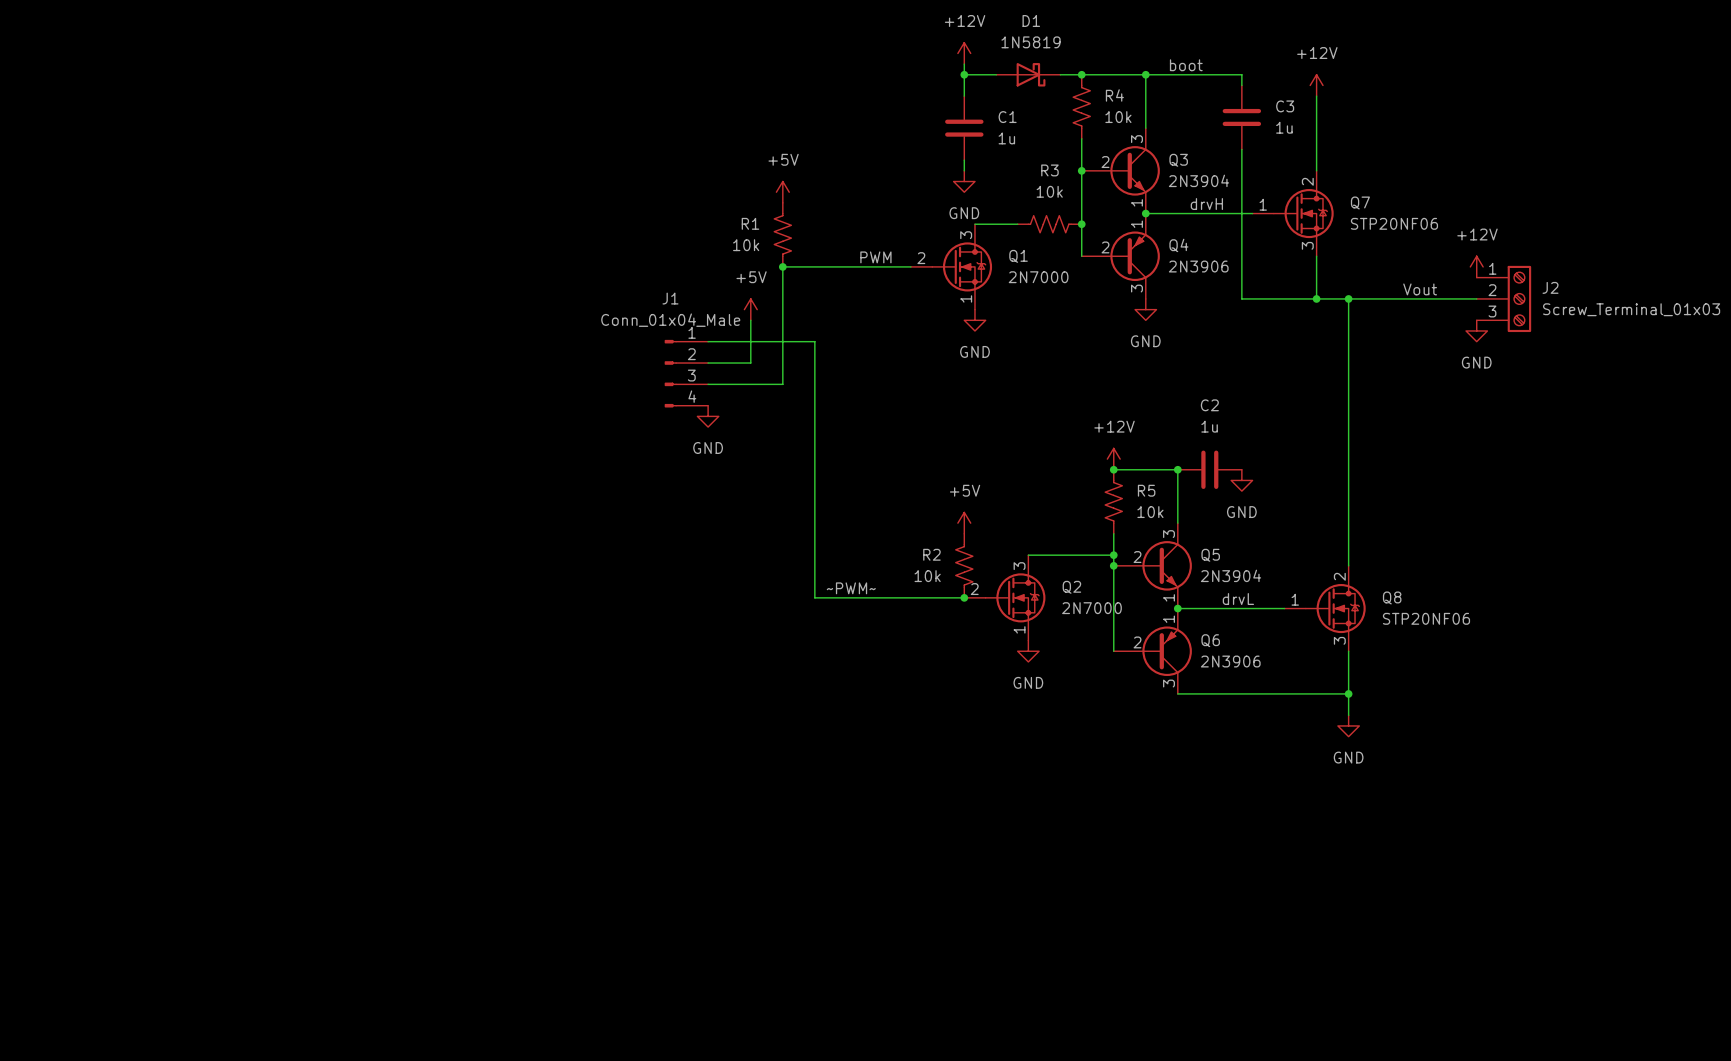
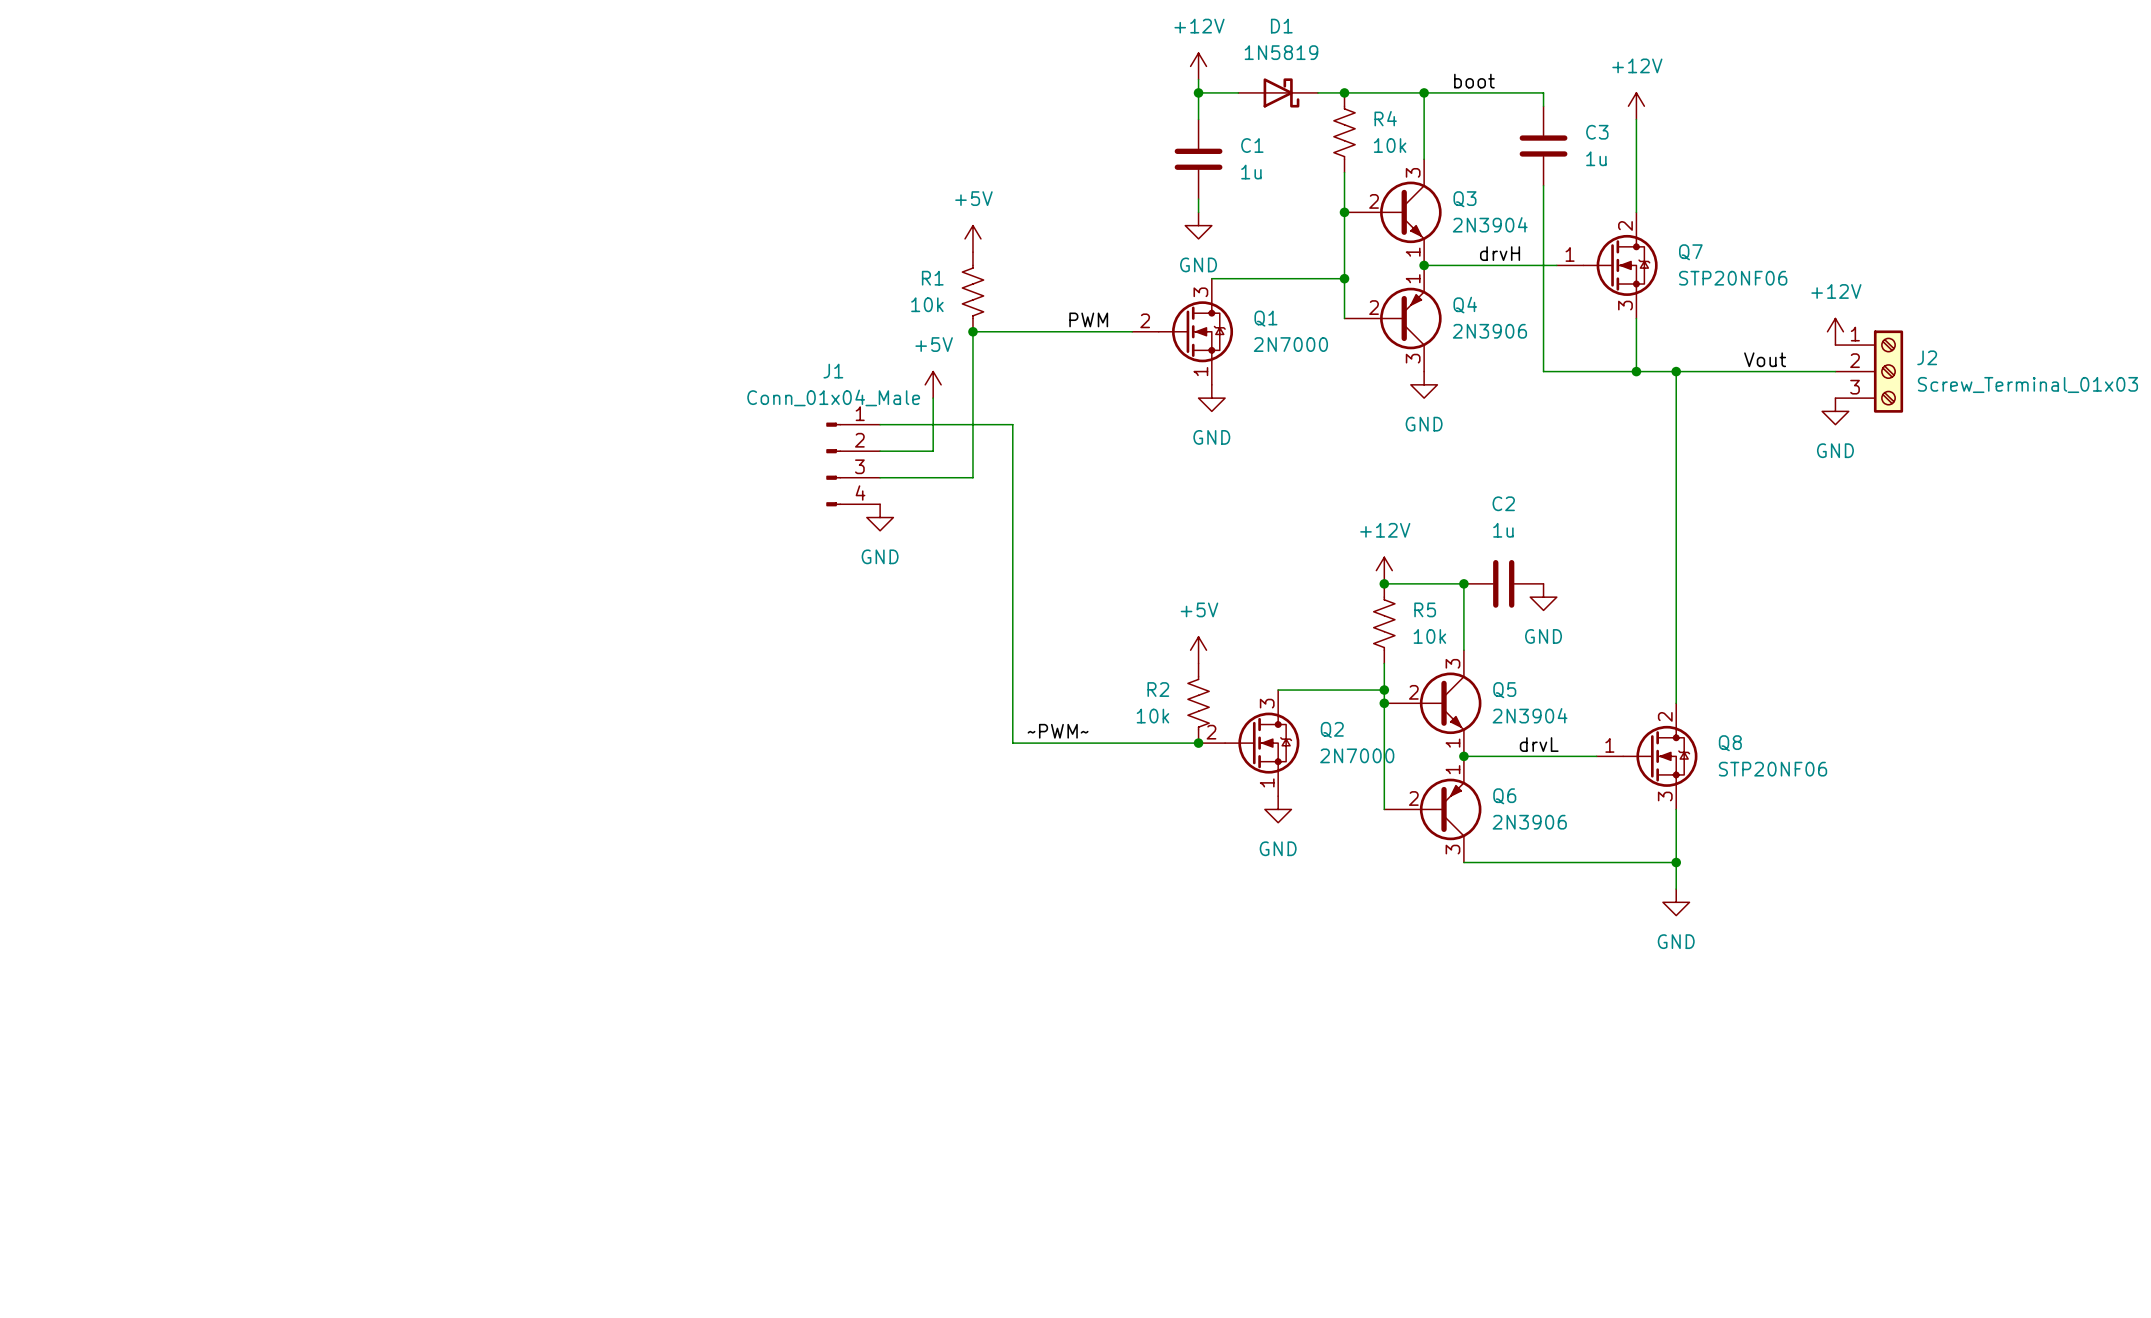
R3: 10k (1049, 224) -> none

